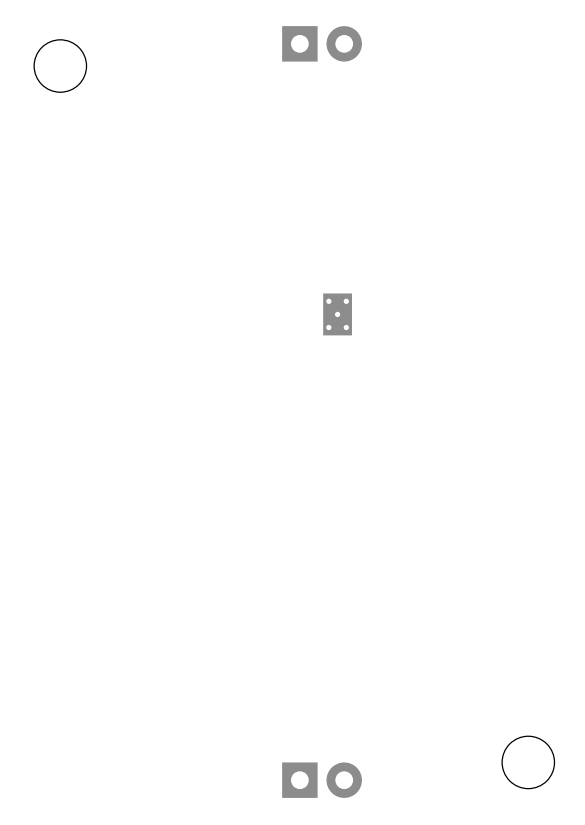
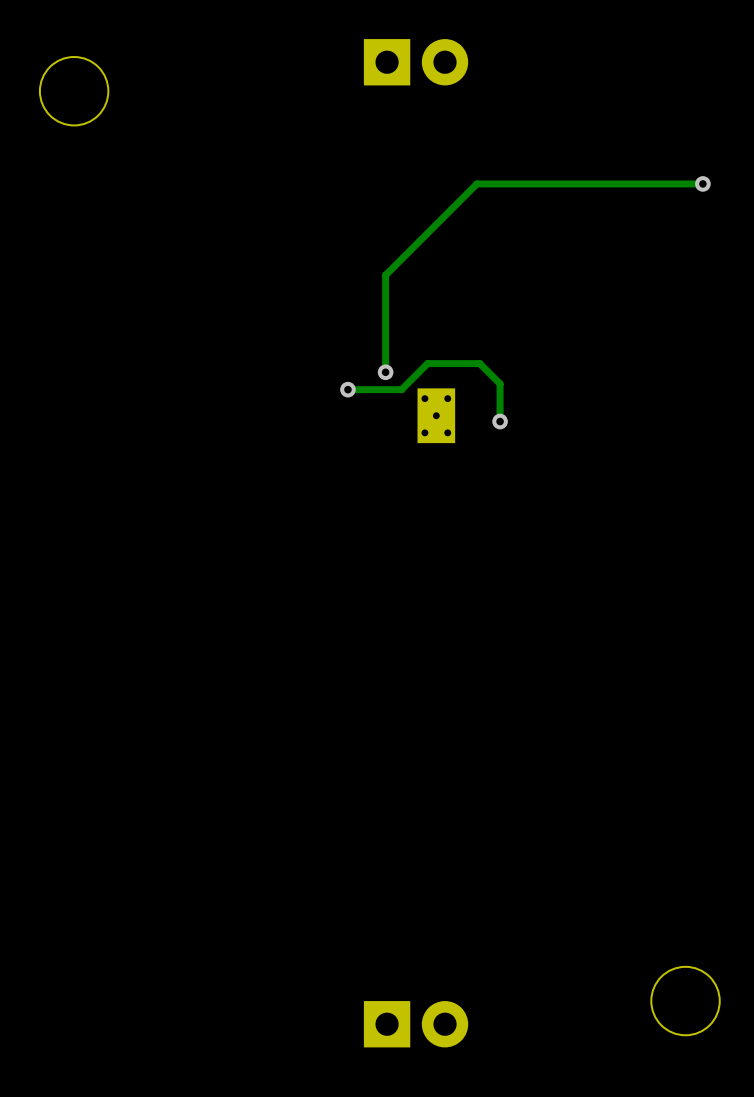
track: none -> (702, 183) (476, 183) (385, 275) (385, 372)
via: none -> (702, 183)
via: none -> (385, 372)
track: none -> (347, 389) (401, 389) (427, 363) (479, 363) (500, 383) (500, 421)
via: none -> (347, 389)
via: none -> (500, 421)

